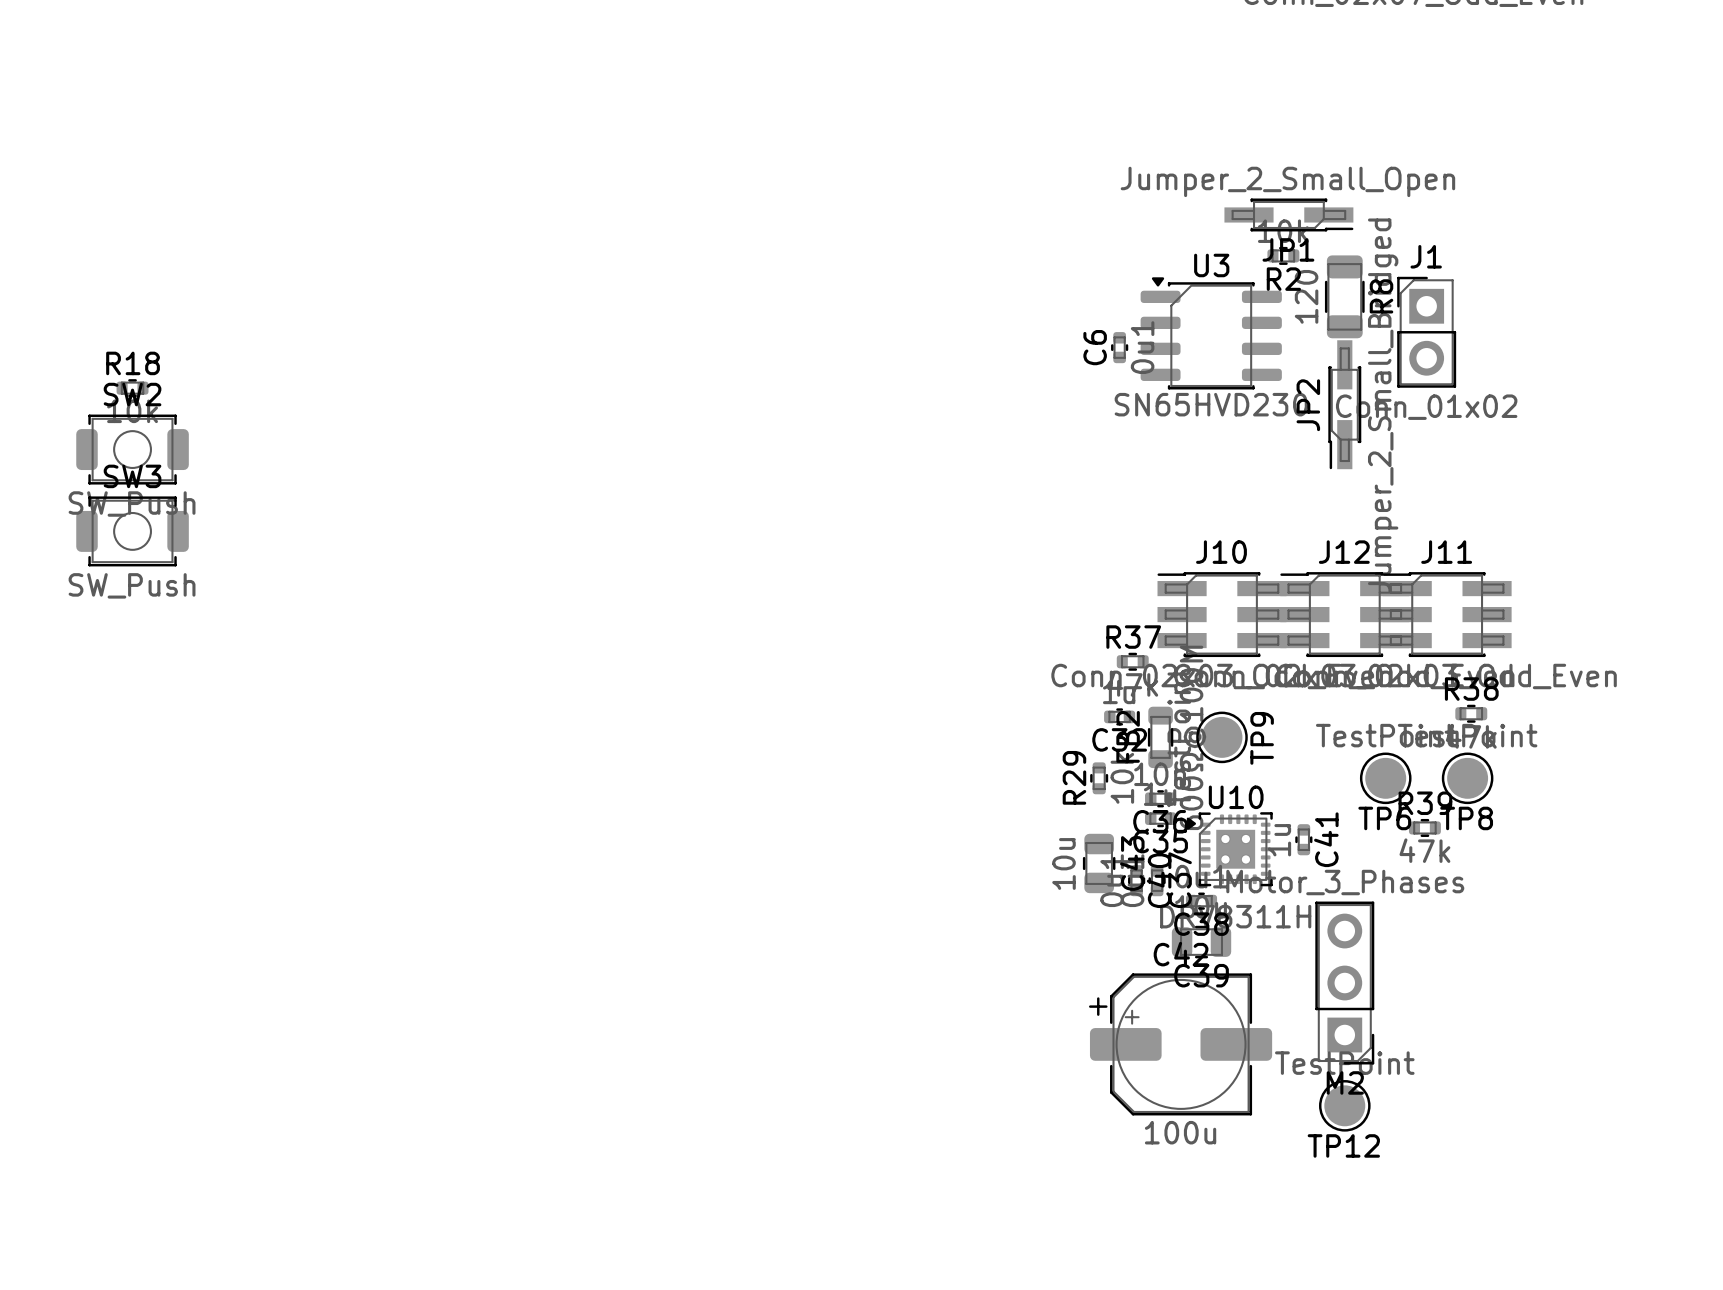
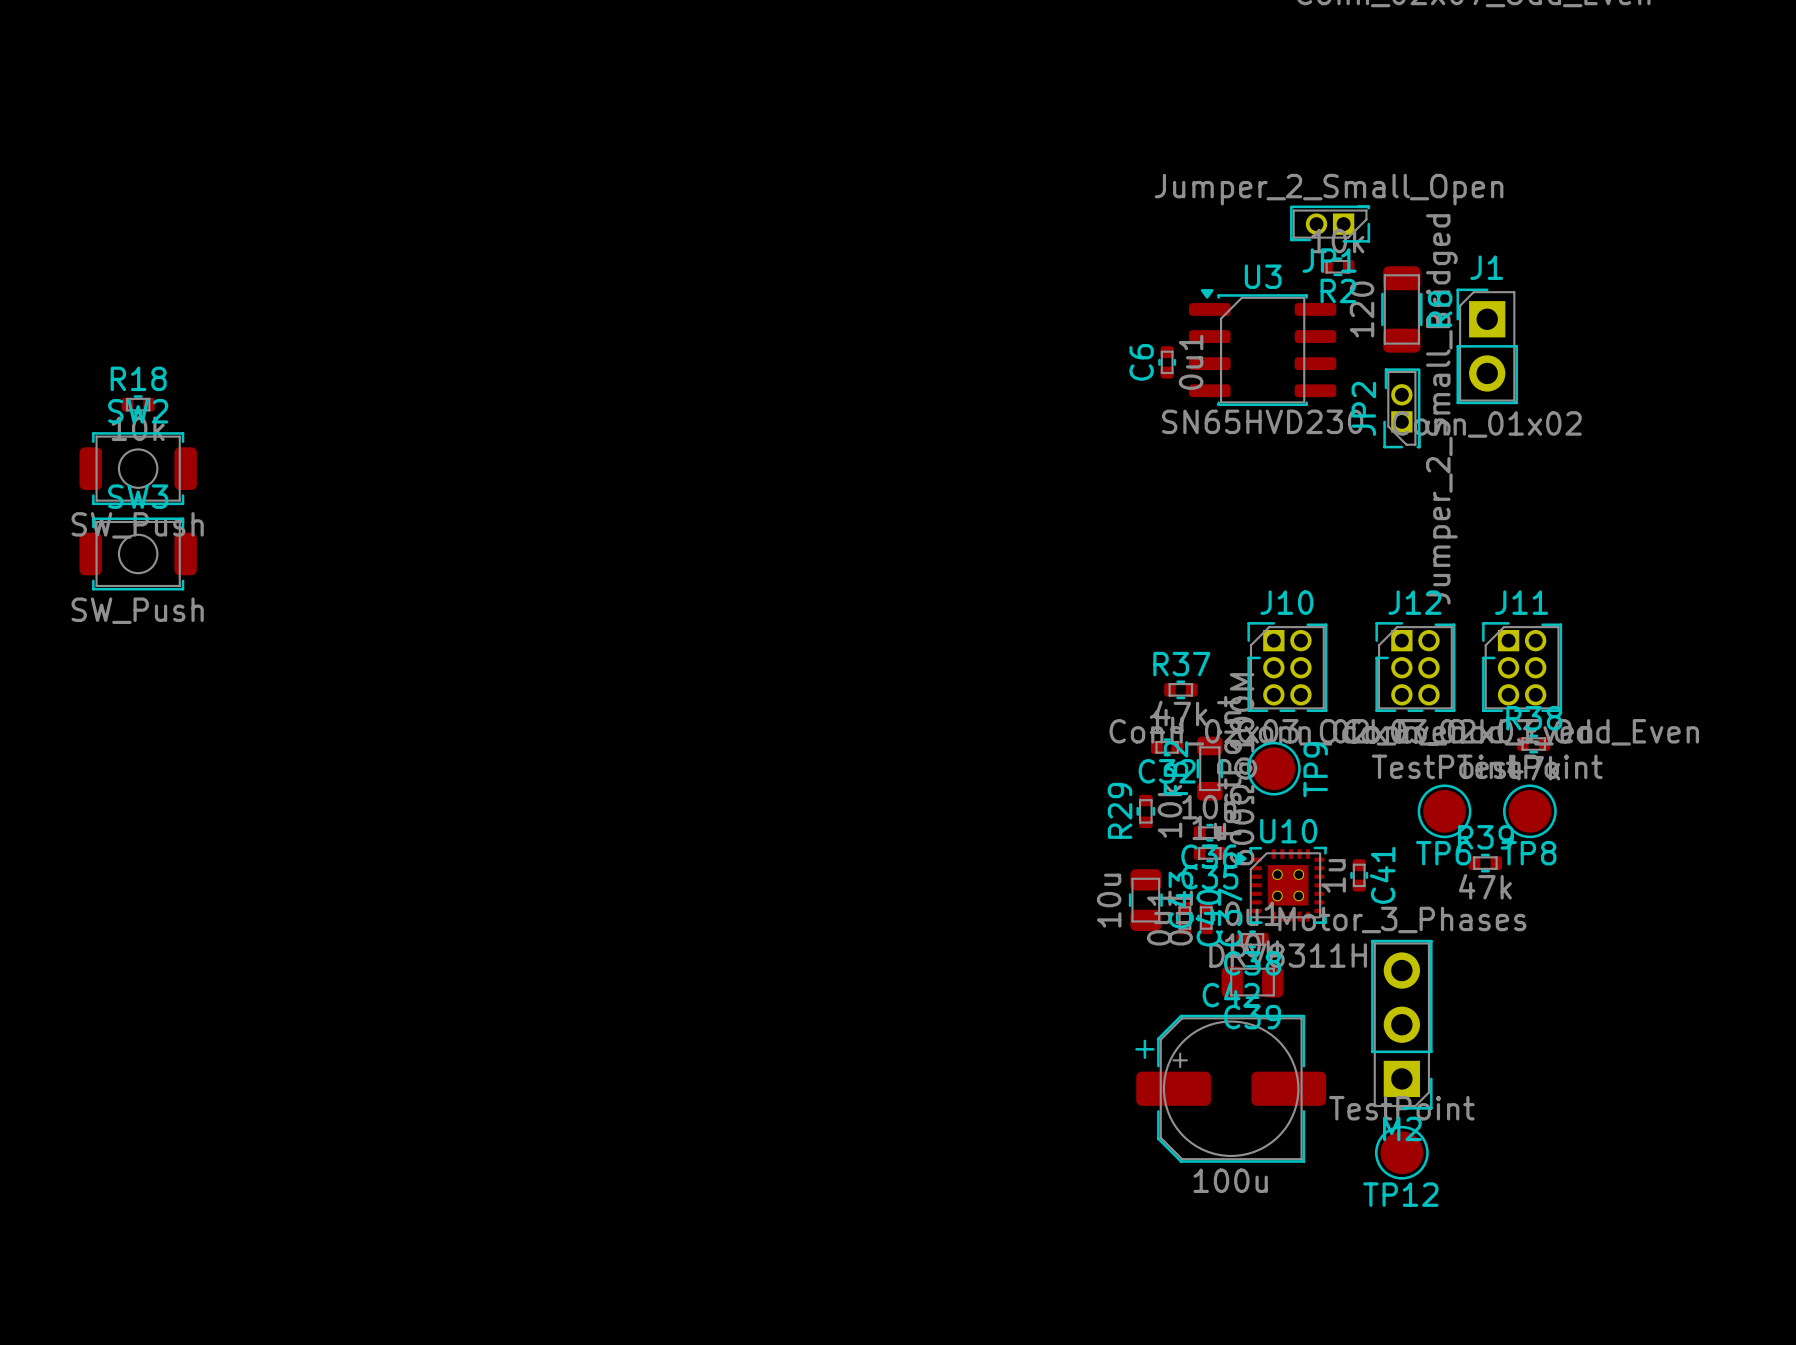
JP1 footprint: [1224, 198, 1354, 232] -> [1290, 205, 1371, 243]
JP2 footprint: [1328, 340, 1362, 470] -> [1383, 368, 1421, 449]
J10 footprint: [1157, 572, 1287, 658] -> [1247, 622, 1328, 713]
J12 footprint: [1280, 572, 1410, 658] -> [1375, 622, 1456, 713]
J11 footprint: [1382, 572, 1512, 658] -> [1482, 622, 1563, 713]

